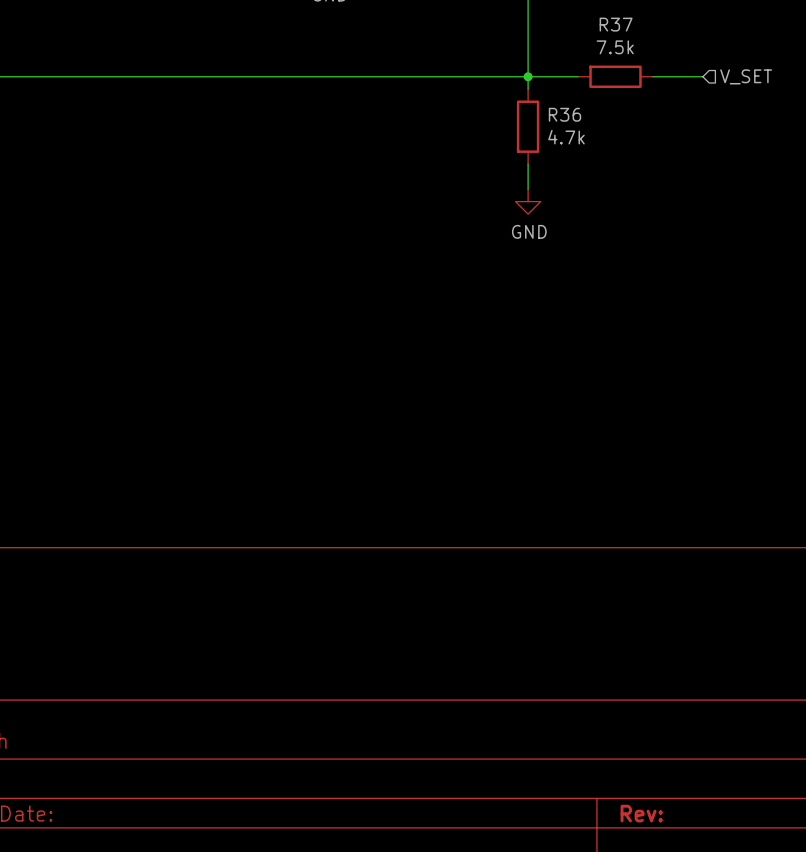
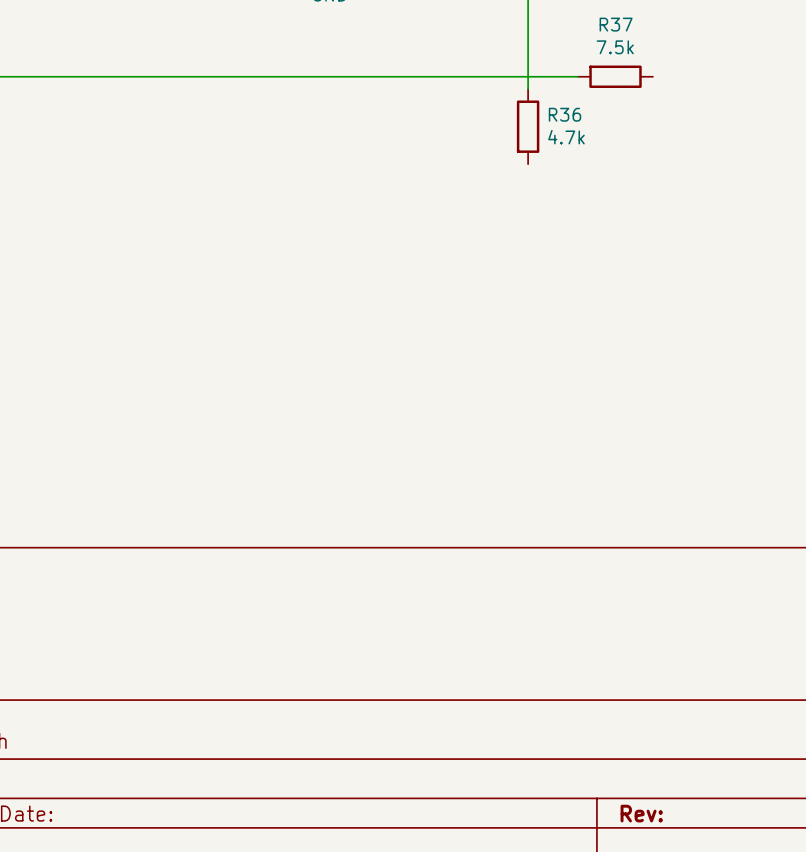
junction: (528, 76) -> none
wire: (652, 76) (702, 76) -> none
hierarchical label: V_SET (746, 76) -> none
wire: (528, 164) (528, 189) -> none
power symbol: GND (528, 201) -> none

